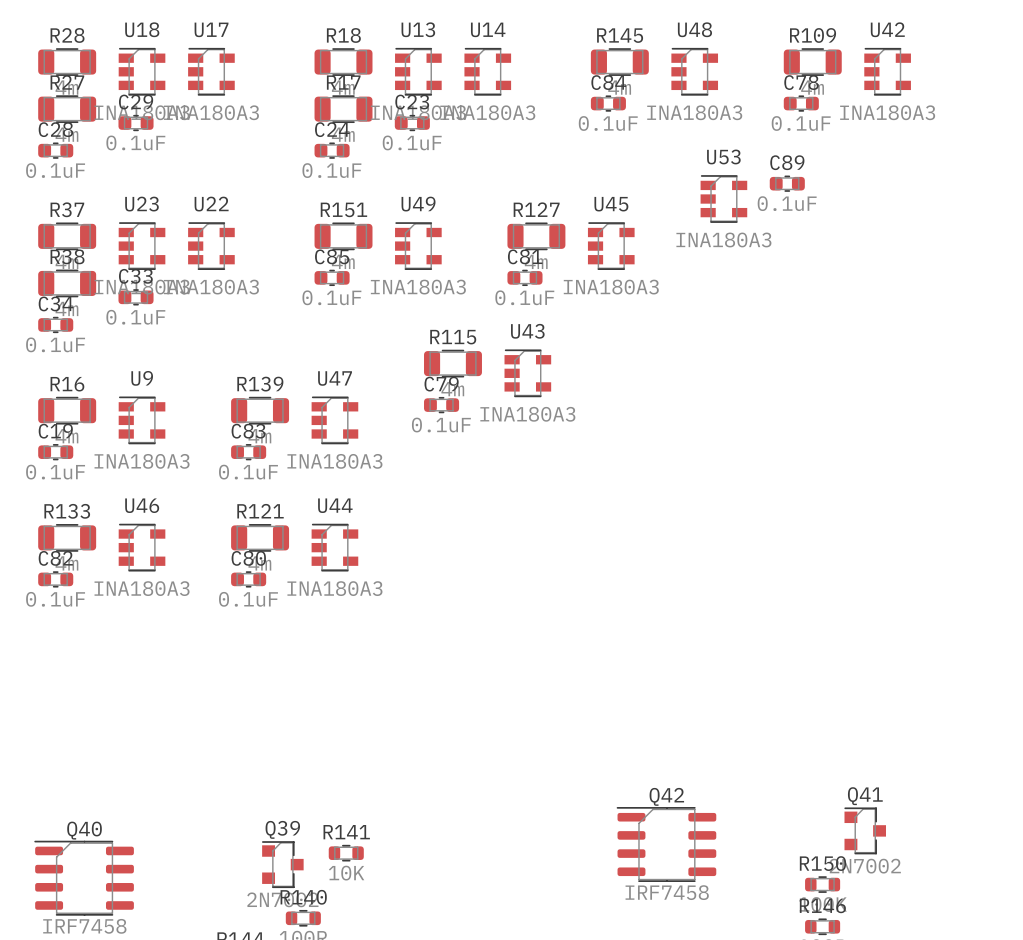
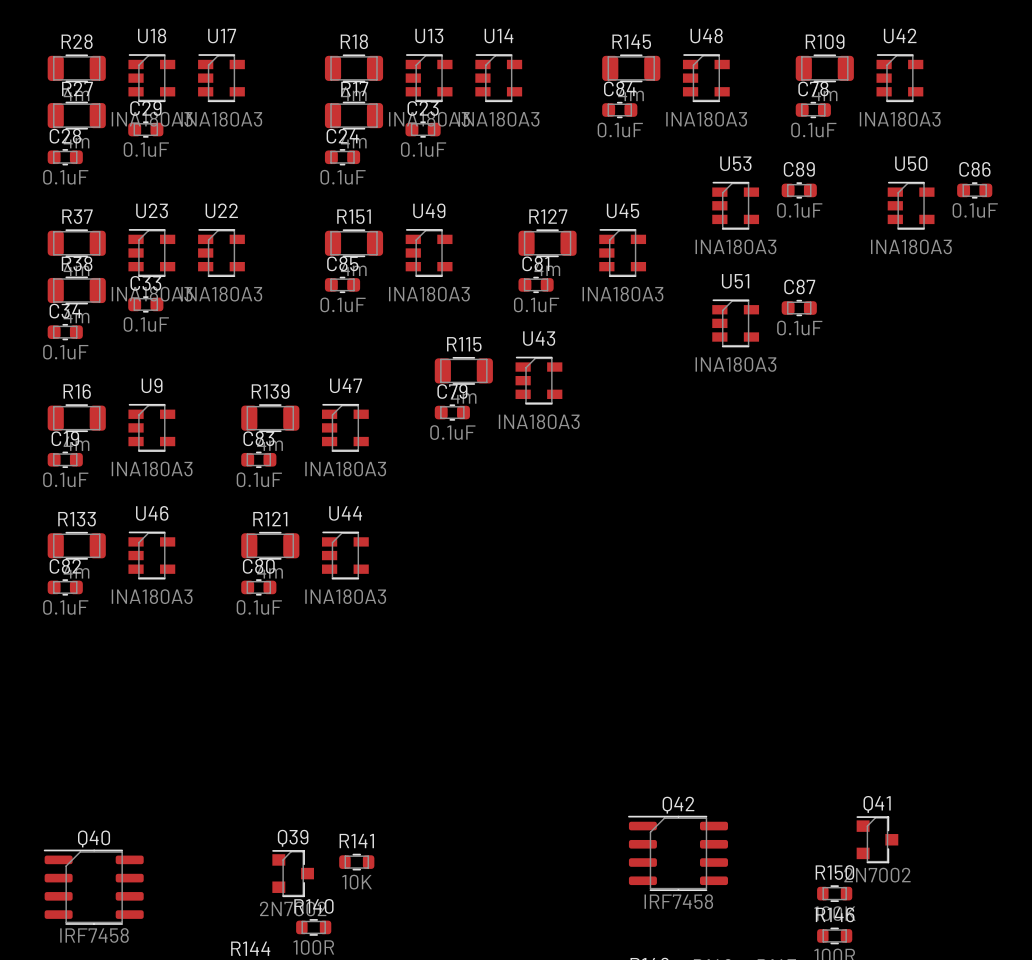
C86: none -> 0.1uF (974, 190)
U50: none -> INA180A3 (911, 205)
C87: none -> 0.1uF (799, 308)
U51: none -> INA180A3 (735, 323)

